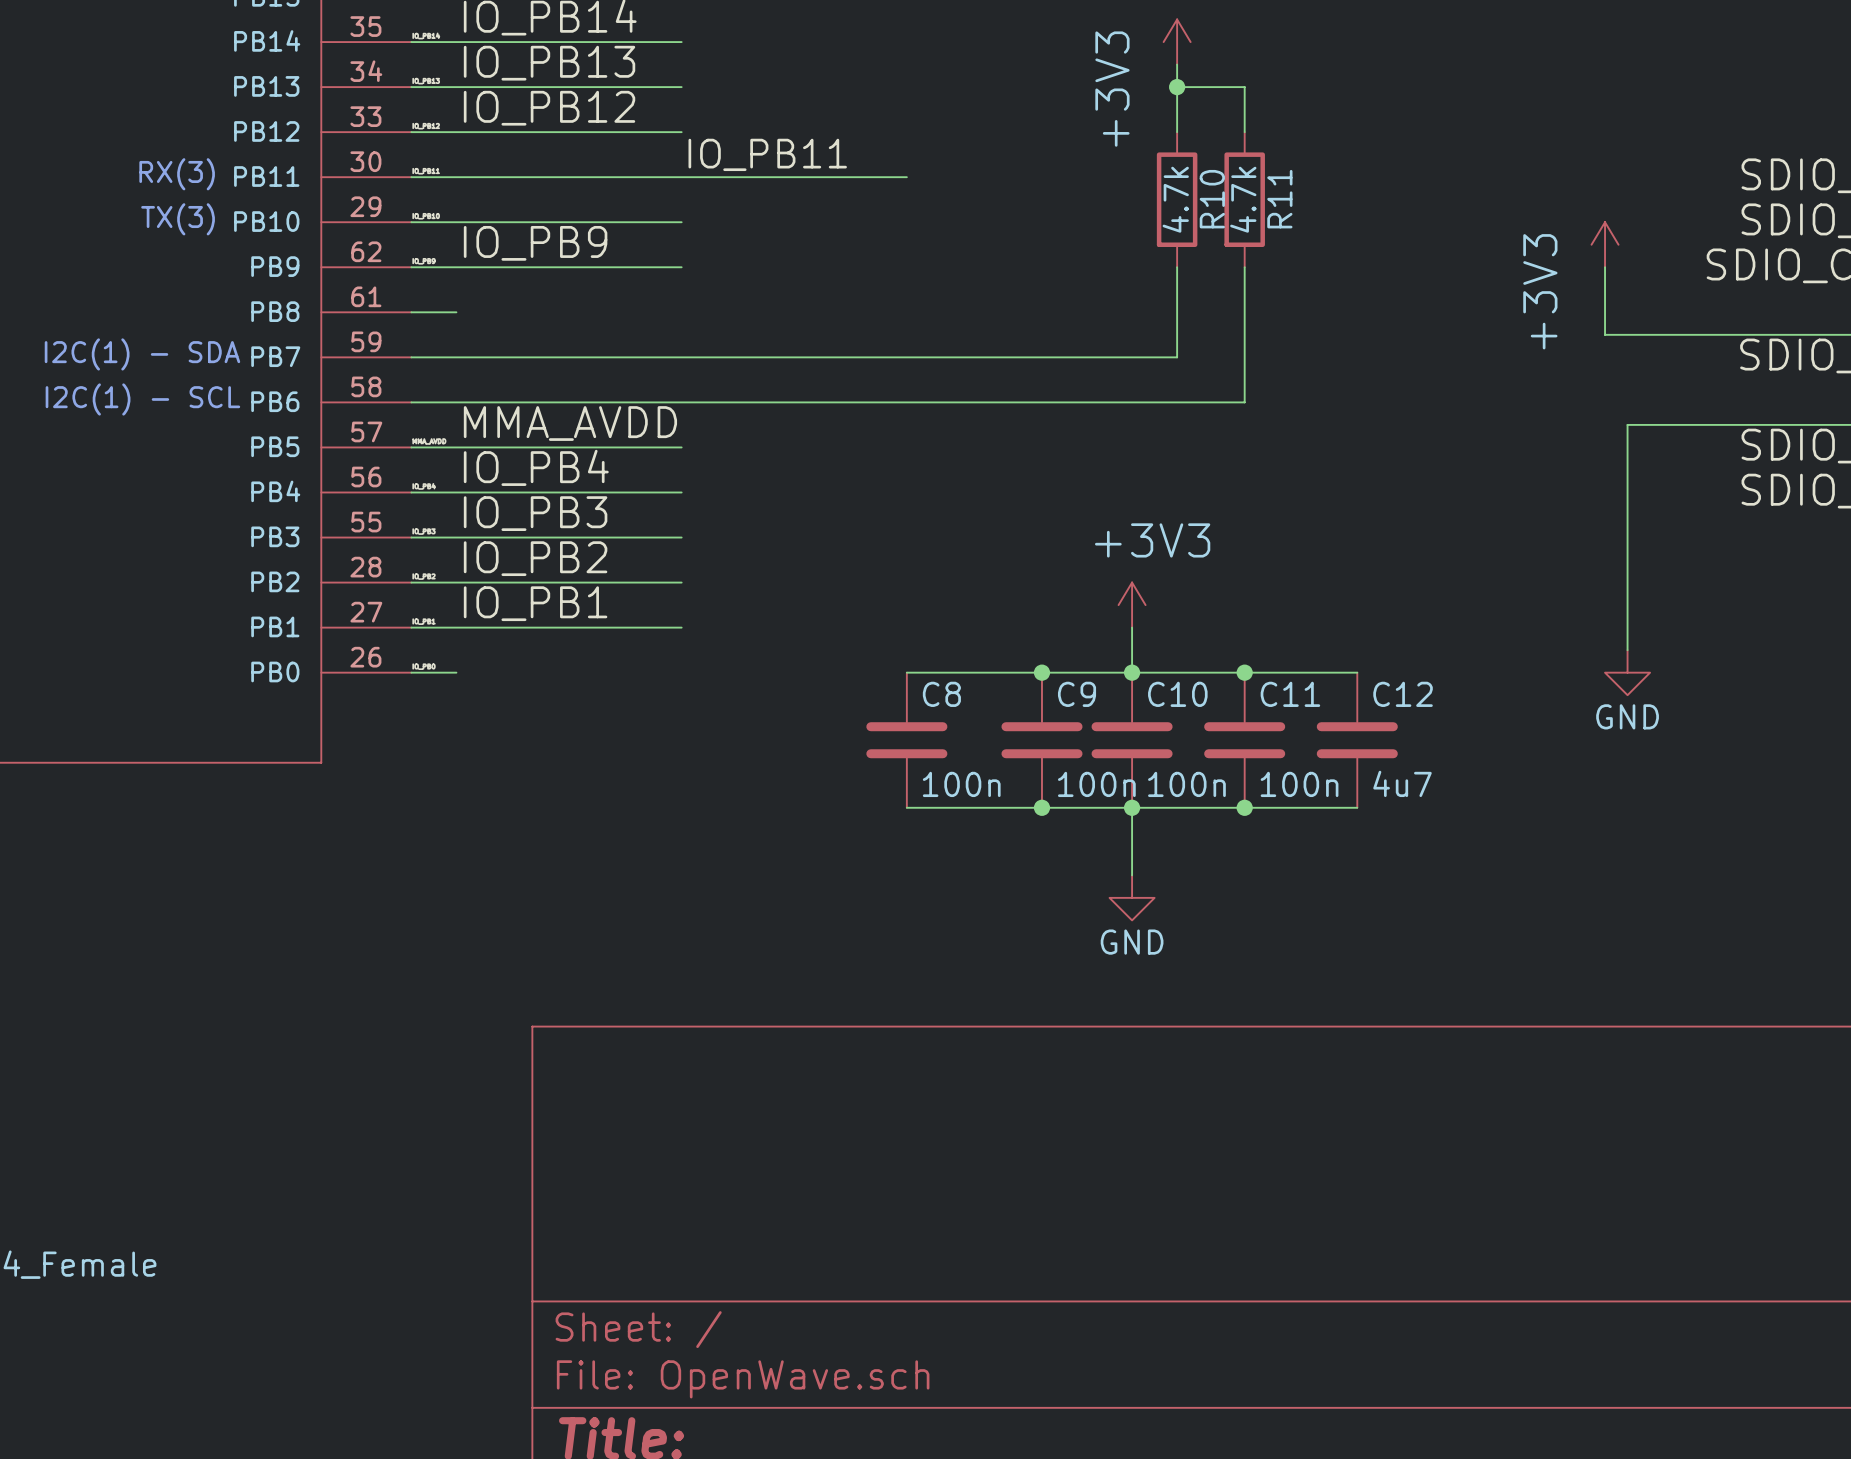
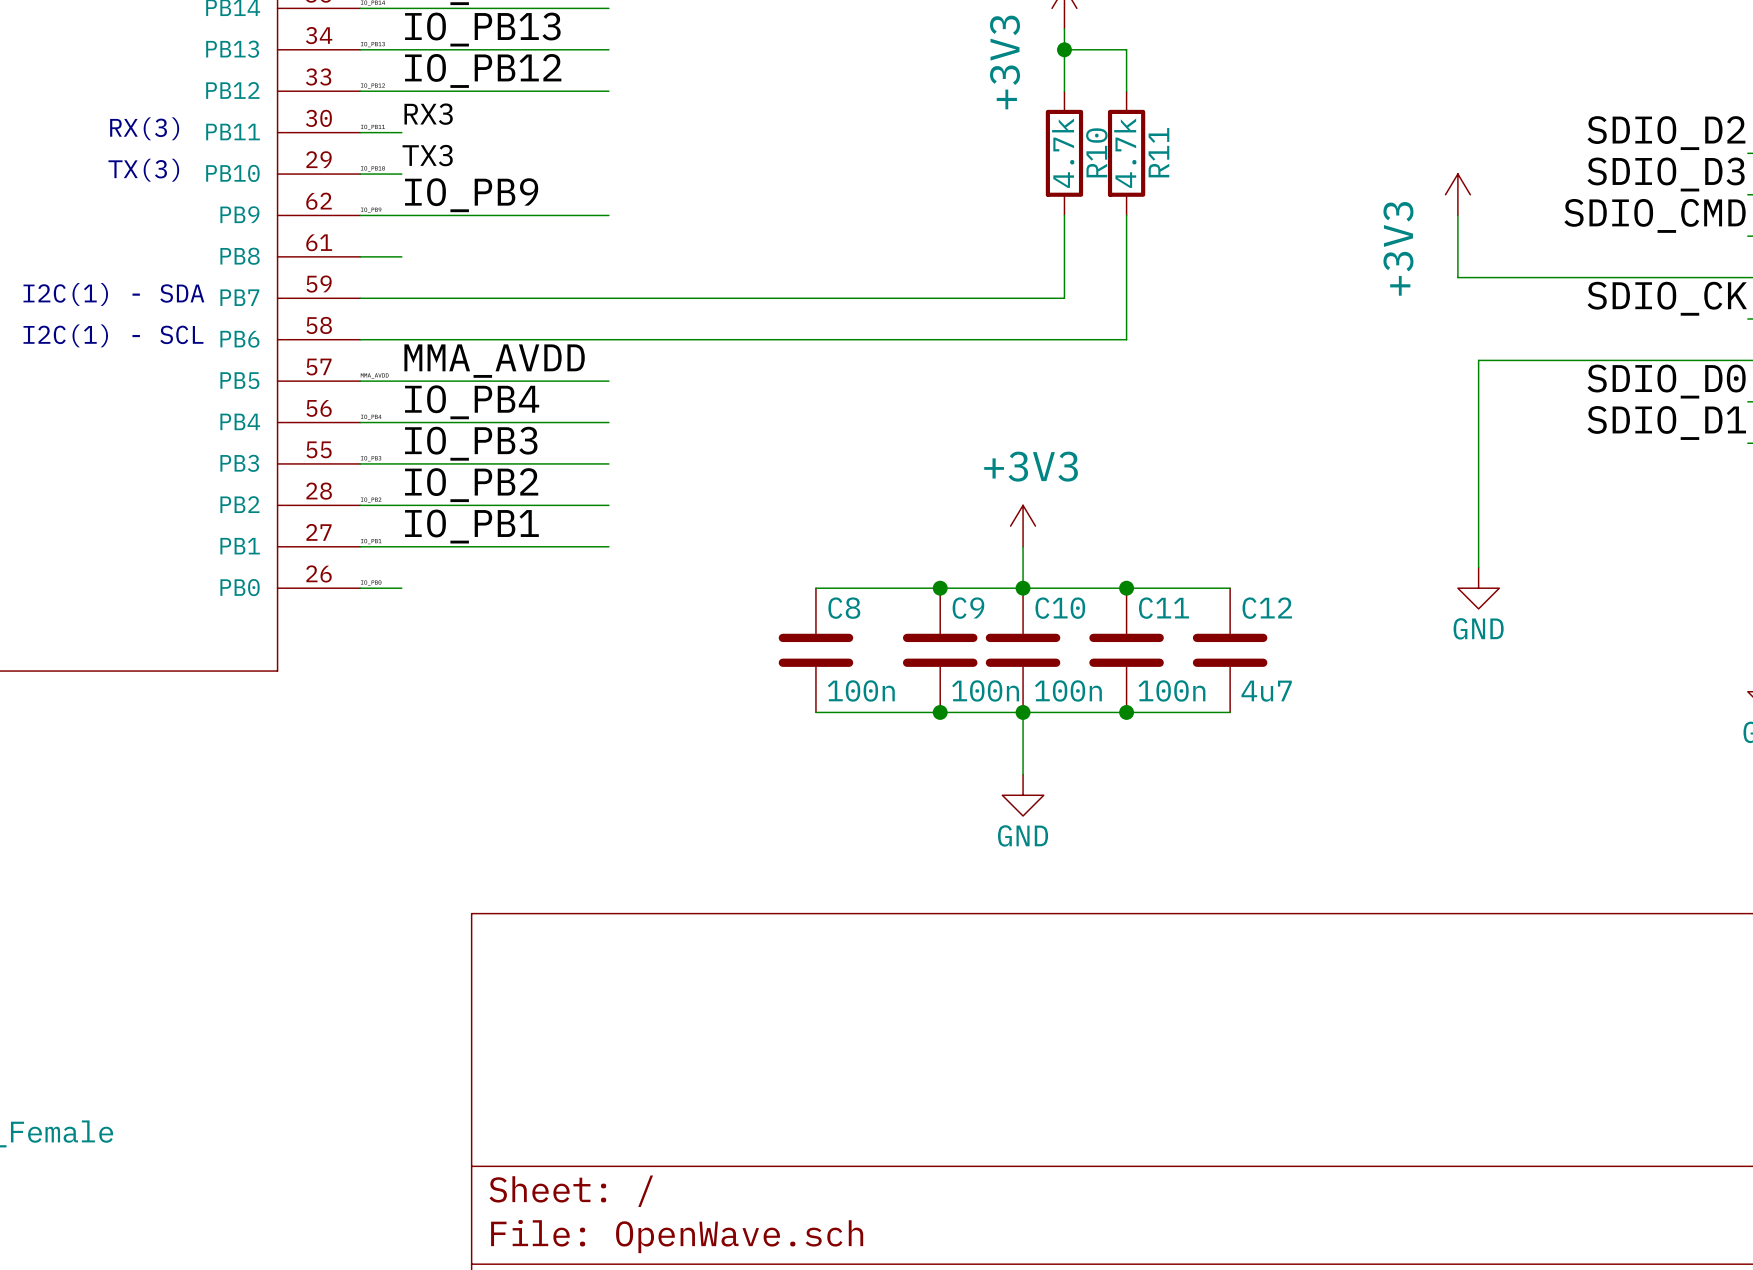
label: IO_PB11 (767, 154) -> none
label: none -> RX3 (428, 114)
wire: (456, 177) (906, 177) -> none
label: none -> TX3 (427, 155)
wire: (456, 222) (681, 222) -> none

